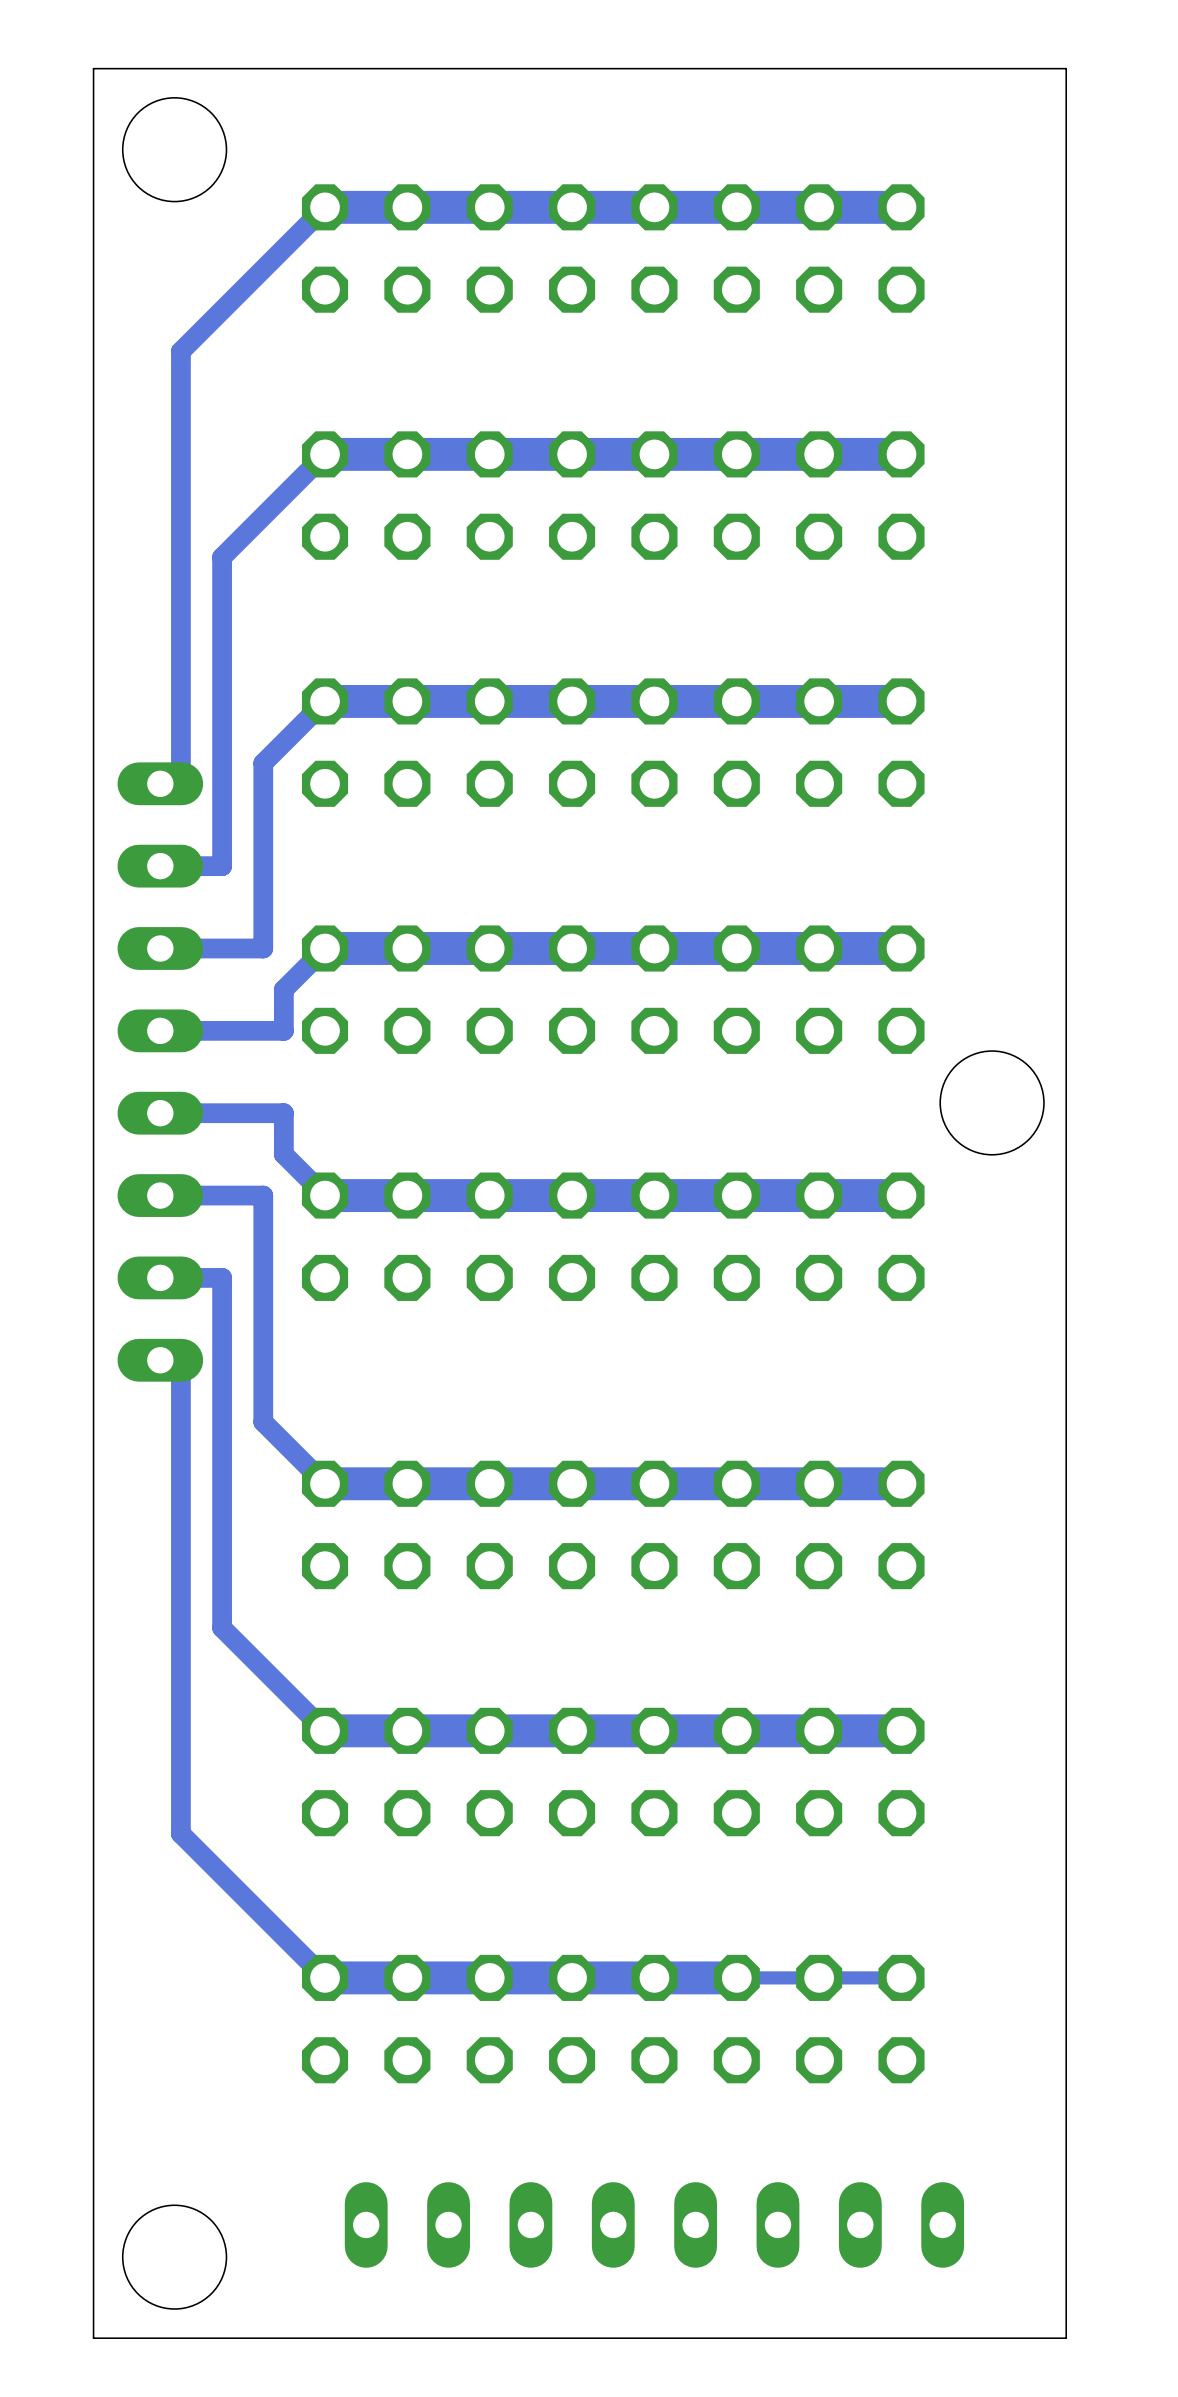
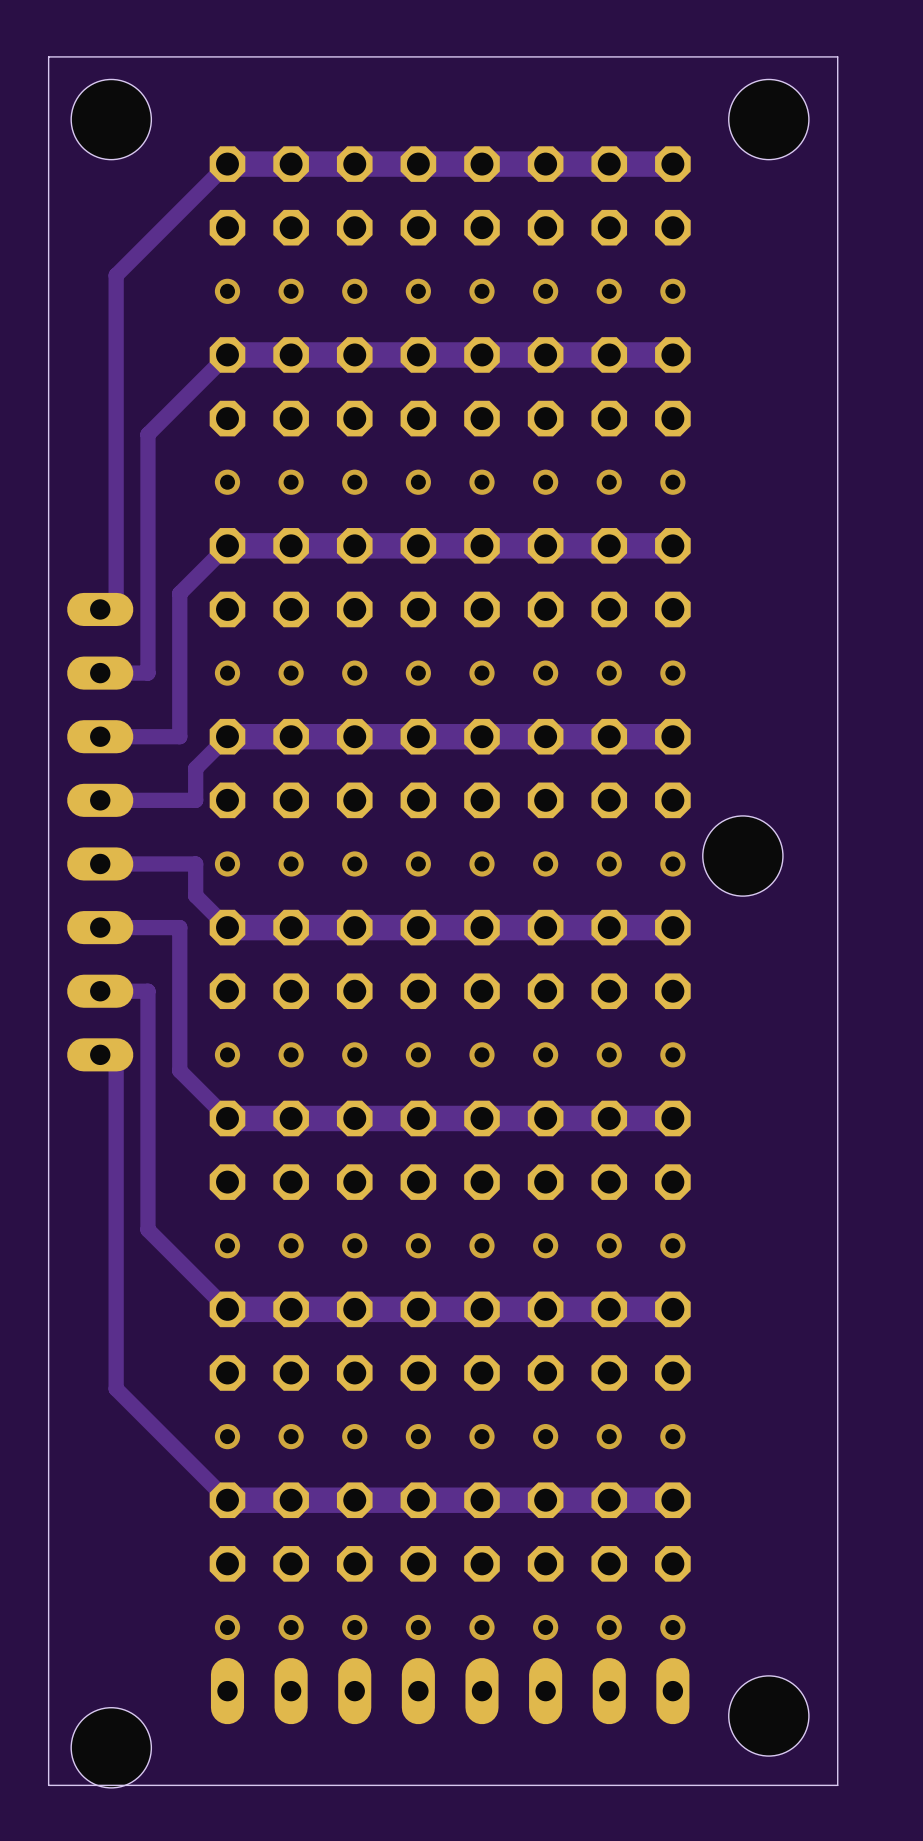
board edge: (1066, 68) (1066, 2338) (93, 2338) (93, 2305) -> (800, 56) (837, 56) (837, 1785) (48, 1785)
hole: none -> (768, 119)
via: none -> (227, 291)
via: none -> (291, 291)
via: none -> (354, 291)
via: none -> (418, 291)
via: none -> (482, 291)
via: none -> (545, 291)
via: none -> (609, 291)
via: none -> (672, 291)
via: none -> (227, 482)
via: none -> (291, 482)
via: none -> (354, 482)
via: none -> (418, 482)
via: none -> (482, 482)
via: none -> (545, 482)
via: none -> (609, 482)
via: none -> (672, 482)
via: none -> (227, 673)
via: none -> (291, 673)
via: none -> (354, 673)
via: none -> (418, 673)
via: none -> (482, 673)
via: none -> (545, 673)
via: none -> (609, 673)
via: none -> (672, 673)
via: none -> (227, 863)
via: none -> (291, 863)
via: none -> (354, 863)
via: none -> (418, 863)
via: none -> (482, 863)
via: none -> (545, 863)
via: none -> (609, 863)
via: none -> (672, 863)
via: none -> (227, 1054)
via: none -> (291, 1054)
via: none -> (354, 1054)
via: none -> (418, 1054)
via: none -> (482, 1054)
via: none -> (545, 1054)
via: none -> (609, 1054)
via: none -> (672, 1054)
track: (263, 1380) (263, 1422) (325, 1483) (901, 1483) -> (179, 1070) (227, 1118) (672, 1118)
part position: (613, 1524) -> (450, 1150)
track: (222, 1586) (222, 1627) (325, 1730) (901, 1730) -> (147, 1229) (227, 1309) (672, 1309)
via: none -> (227, 1245)
via: none -> (291, 1245)
via: none -> (354, 1245)
via: none -> (418, 1245)
via: none -> (482, 1245)
via: none -> (545, 1245)
via: none -> (609, 1245)
via: none -> (672, 1245)
part position: (613, 1772) -> (450, 1341)
track: (180, 1792) (180, 1833) (325, 1977) (901, 1977) -> (116, 1388) (227, 1500) (672, 1500)
via: none -> (227, 1436)
via: none -> (291, 1436)
via: none -> (354, 1436)
via: none -> (418, 1436)
via: none -> (482, 1436)
via: none -> (545, 1436)
via: none -> (609, 1436)
via: none -> (672, 1436)
part position: (613, 2019) -> (450, 1532)
via: none -> (227, 1627)
via: none -> (291, 1627)
via: none -> (354, 1627)
via: none -> (418, 1627)
via: none -> (482, 1627)
via: none -> (545, 1627)
via: none -> (609, 1627)
via: none -> (672, 1627)
hole: none -> (768, 1715)
part position: (654, 2224) -> (450, 1691)

